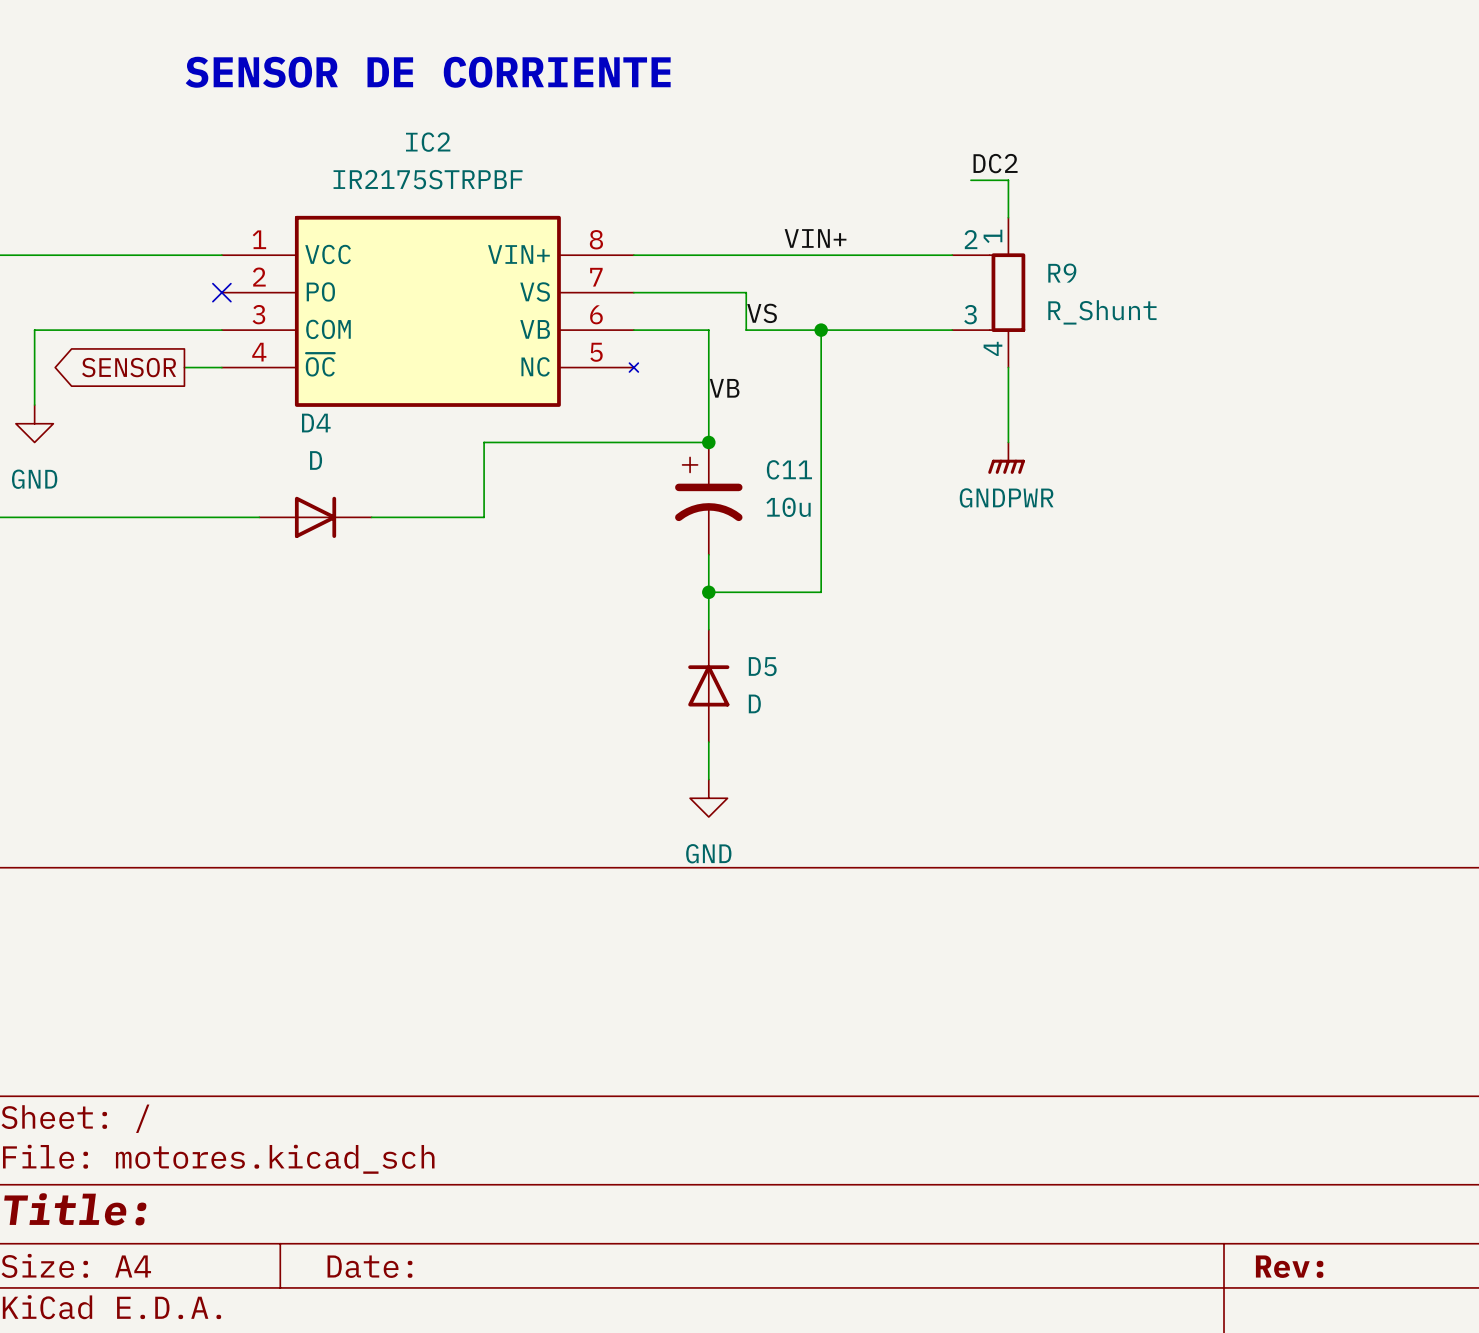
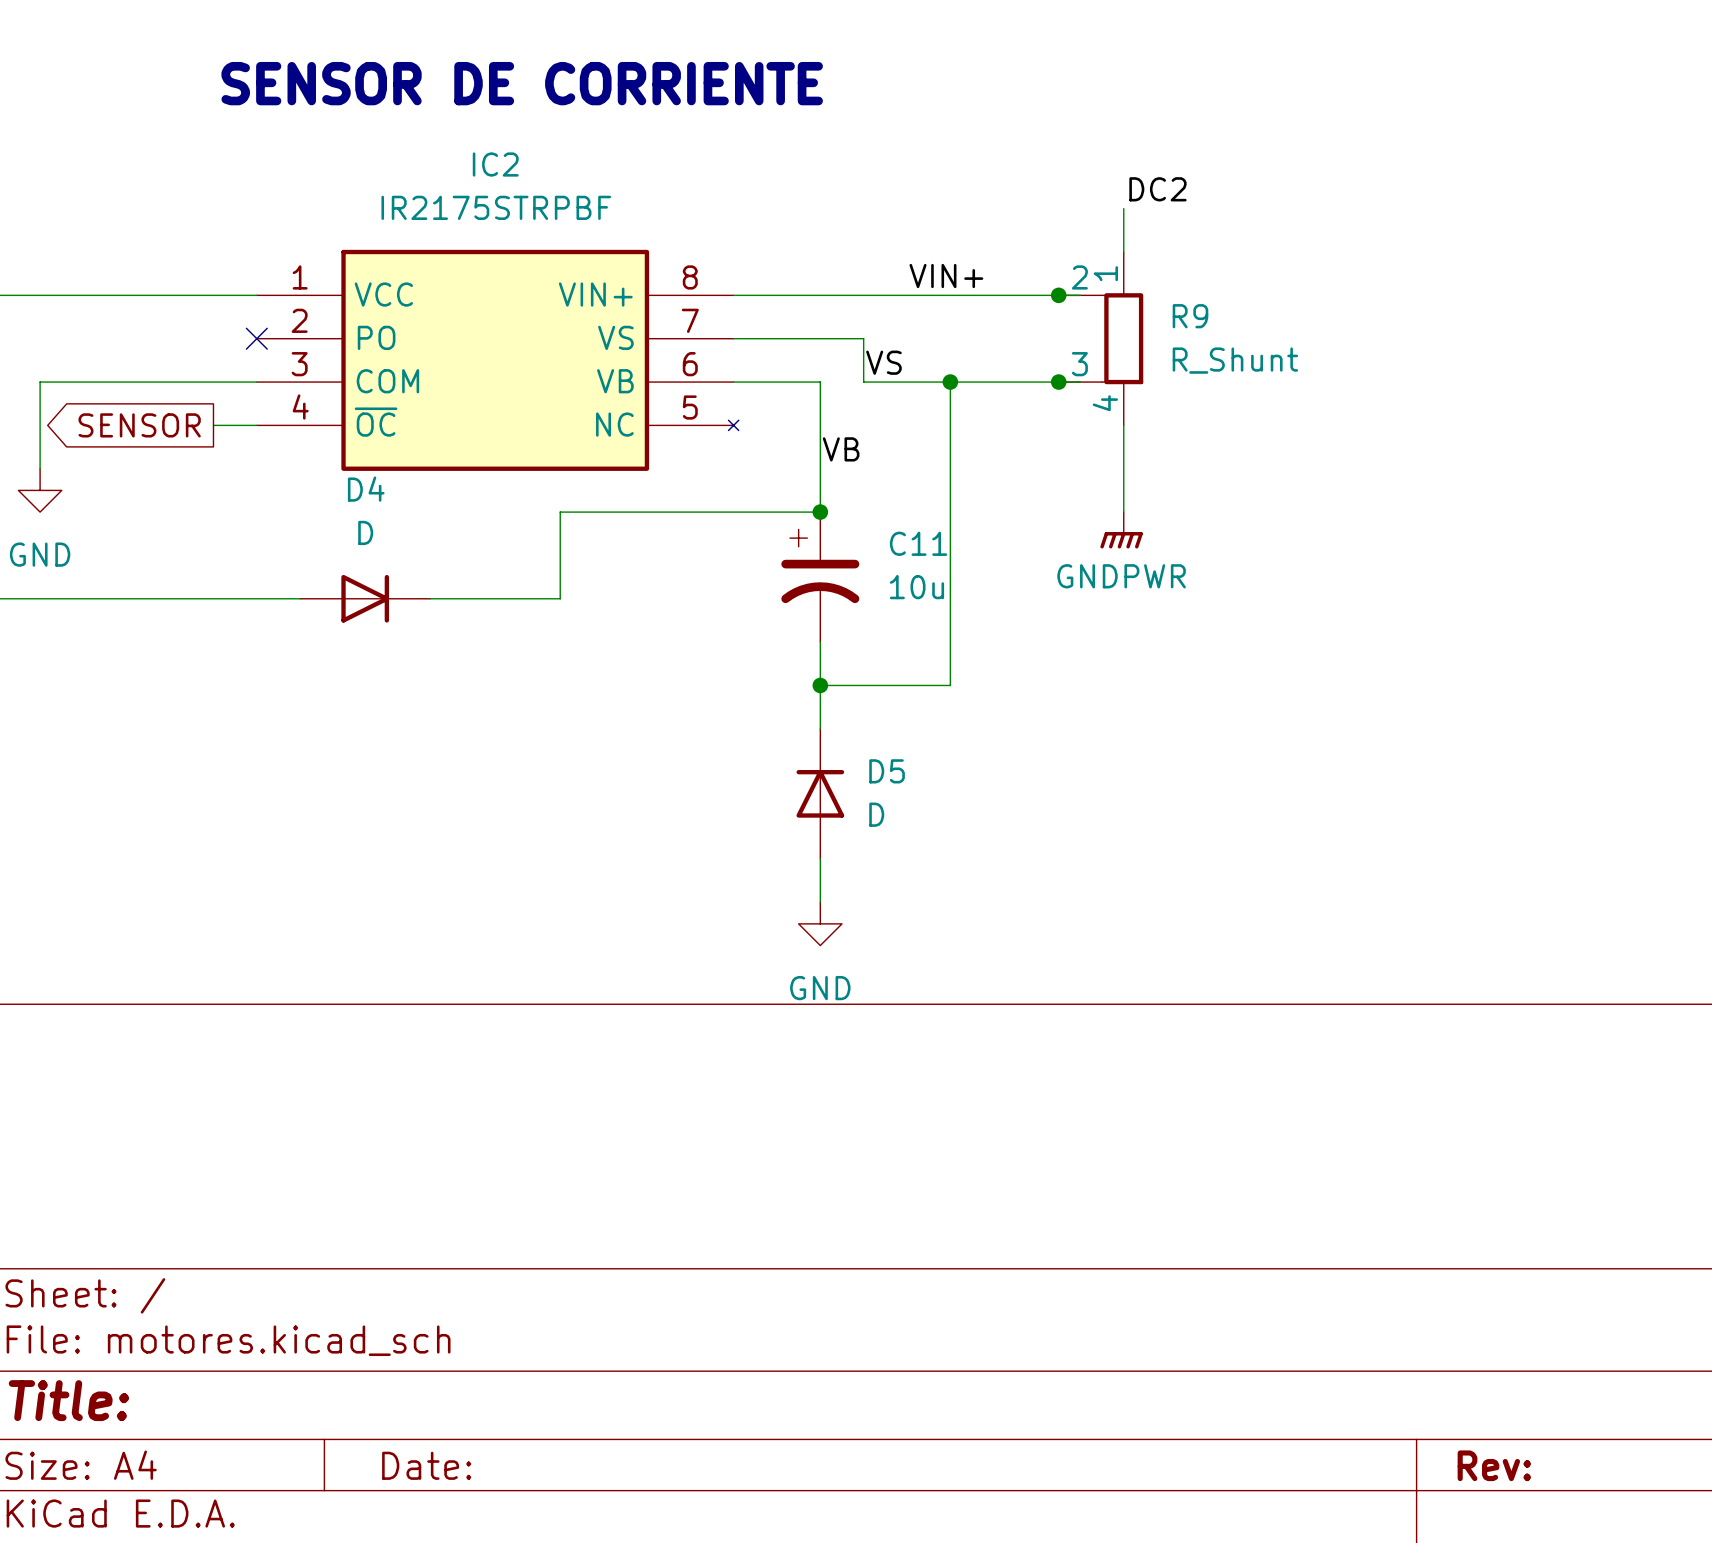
wire: (970, 180) (1008, 180) (1008, 217) -> (1123, 208) (1123, 252)
junction: none -> (1058, 295)
R9 position: (988, 292) -> (1100, 338)
junction: none -> (1058, 382)
wire: (1008, 367) (1008, 442) -> (1123, 425) (1123, 512)
power symbol position: GNDPWR (1006, 458) -> GNDPWR (1121, 530)

